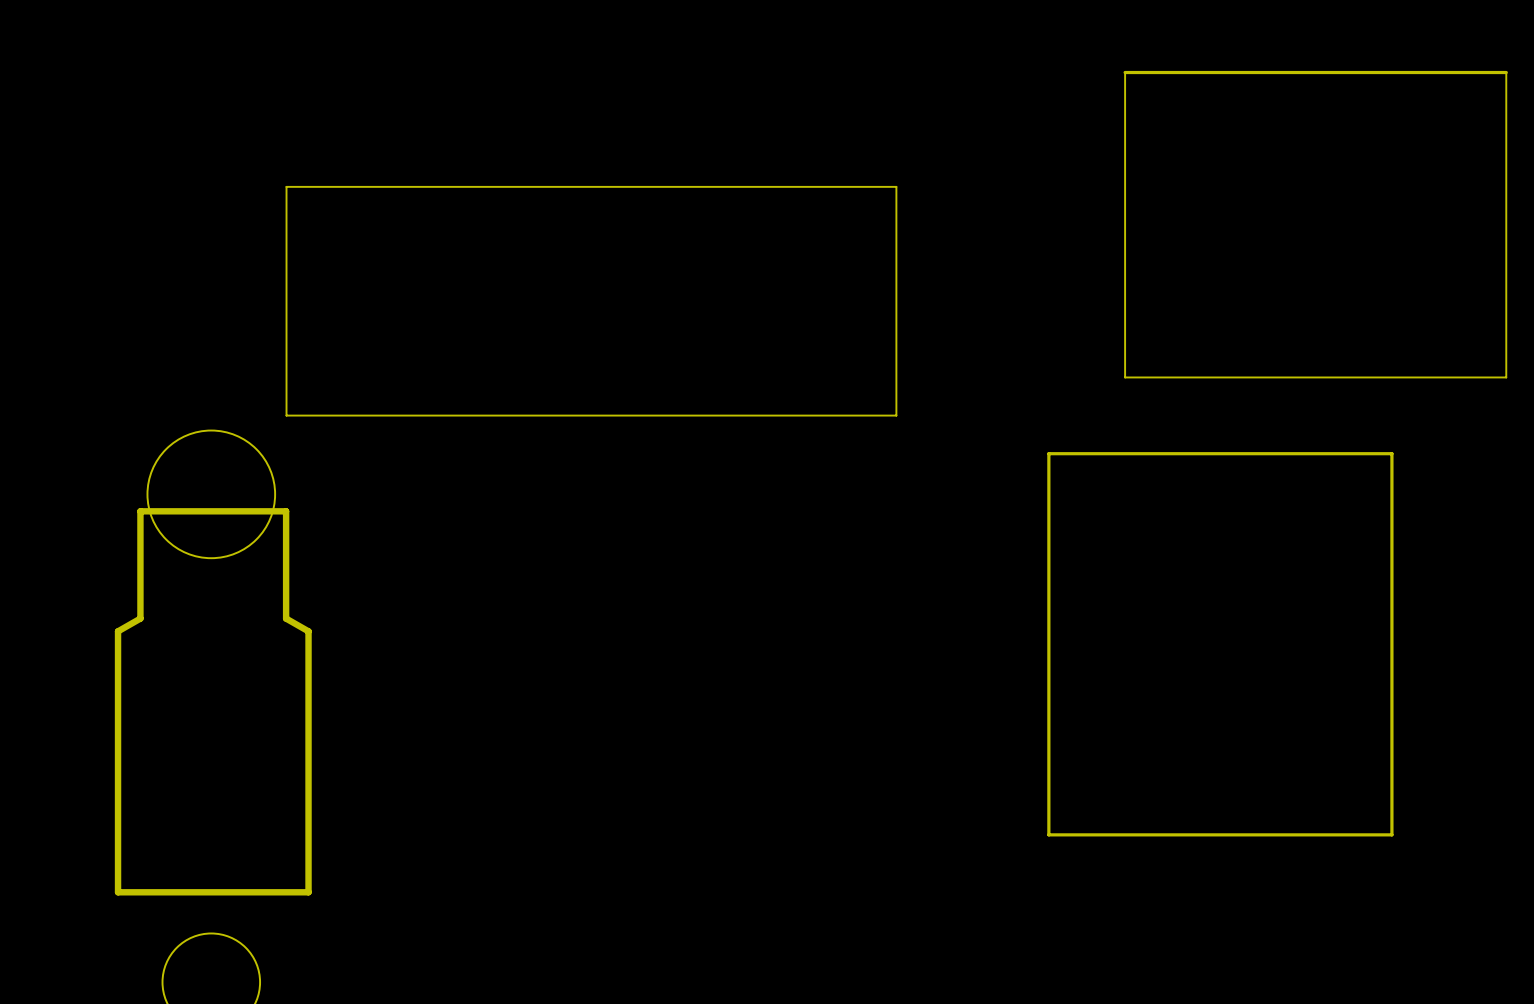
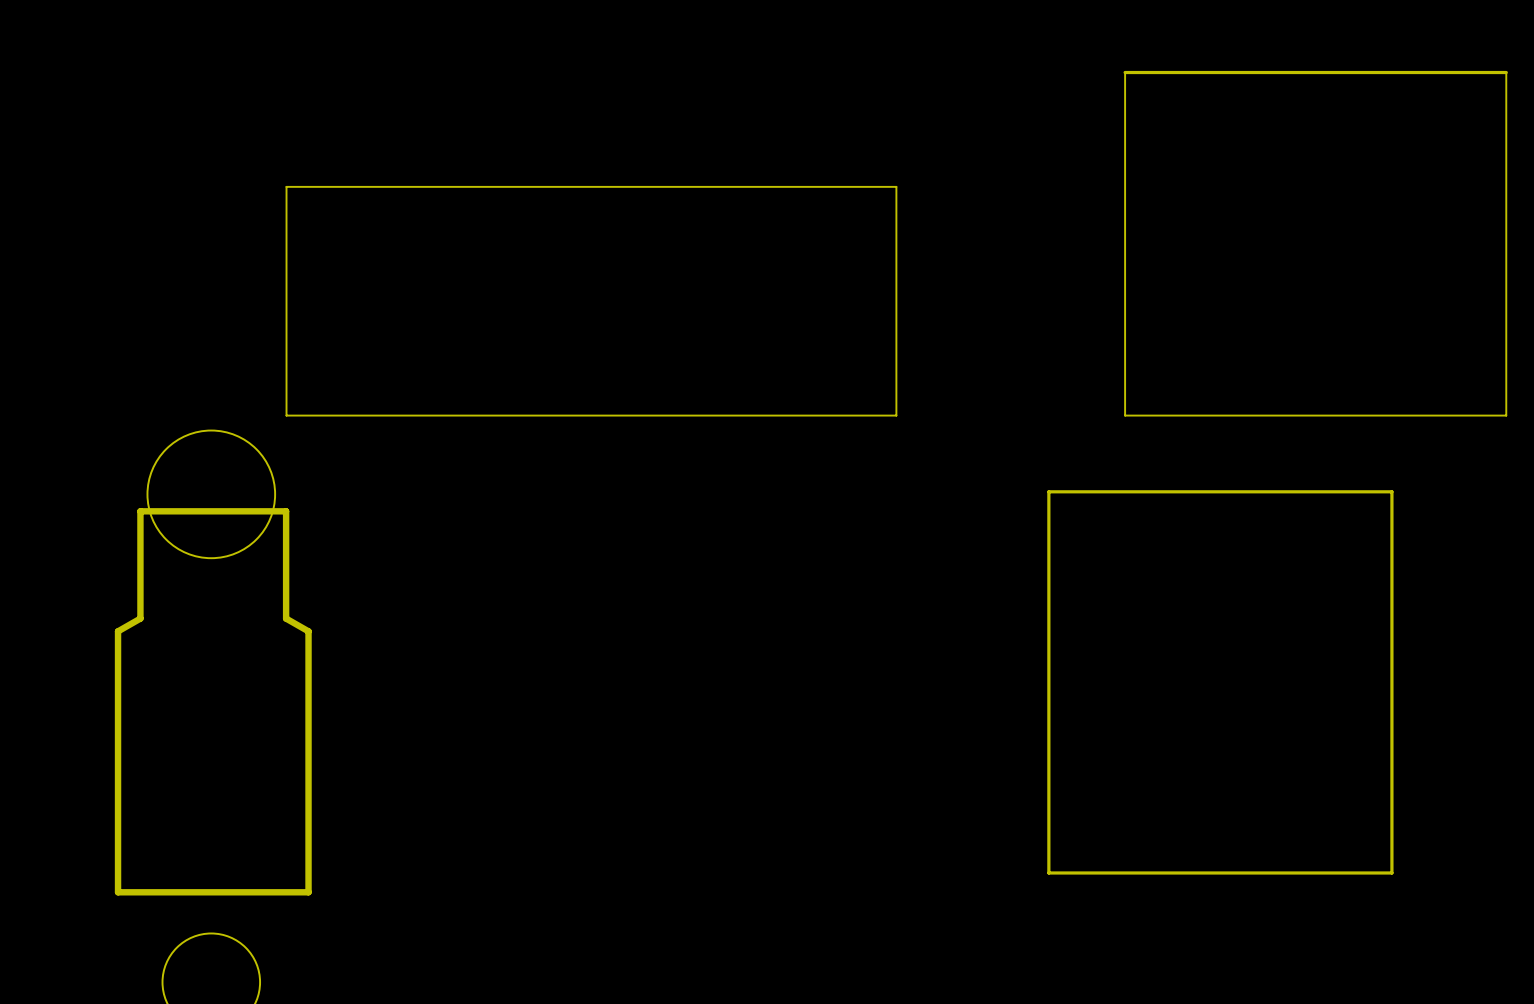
board edge: (1125, 377) (1506, 377) -> (1125, 377) (1125, 415) (1506, 415) (1506, 377)
board edge: (1048, 491) (1048, 453) (1391, 453) (1391, 491) -> (1048, 491) (1391, 491)
board edge: (1048, 834) (1391, 834) -> (1048, 834) (1048, 872) (1391, 872) (1391, 834)

